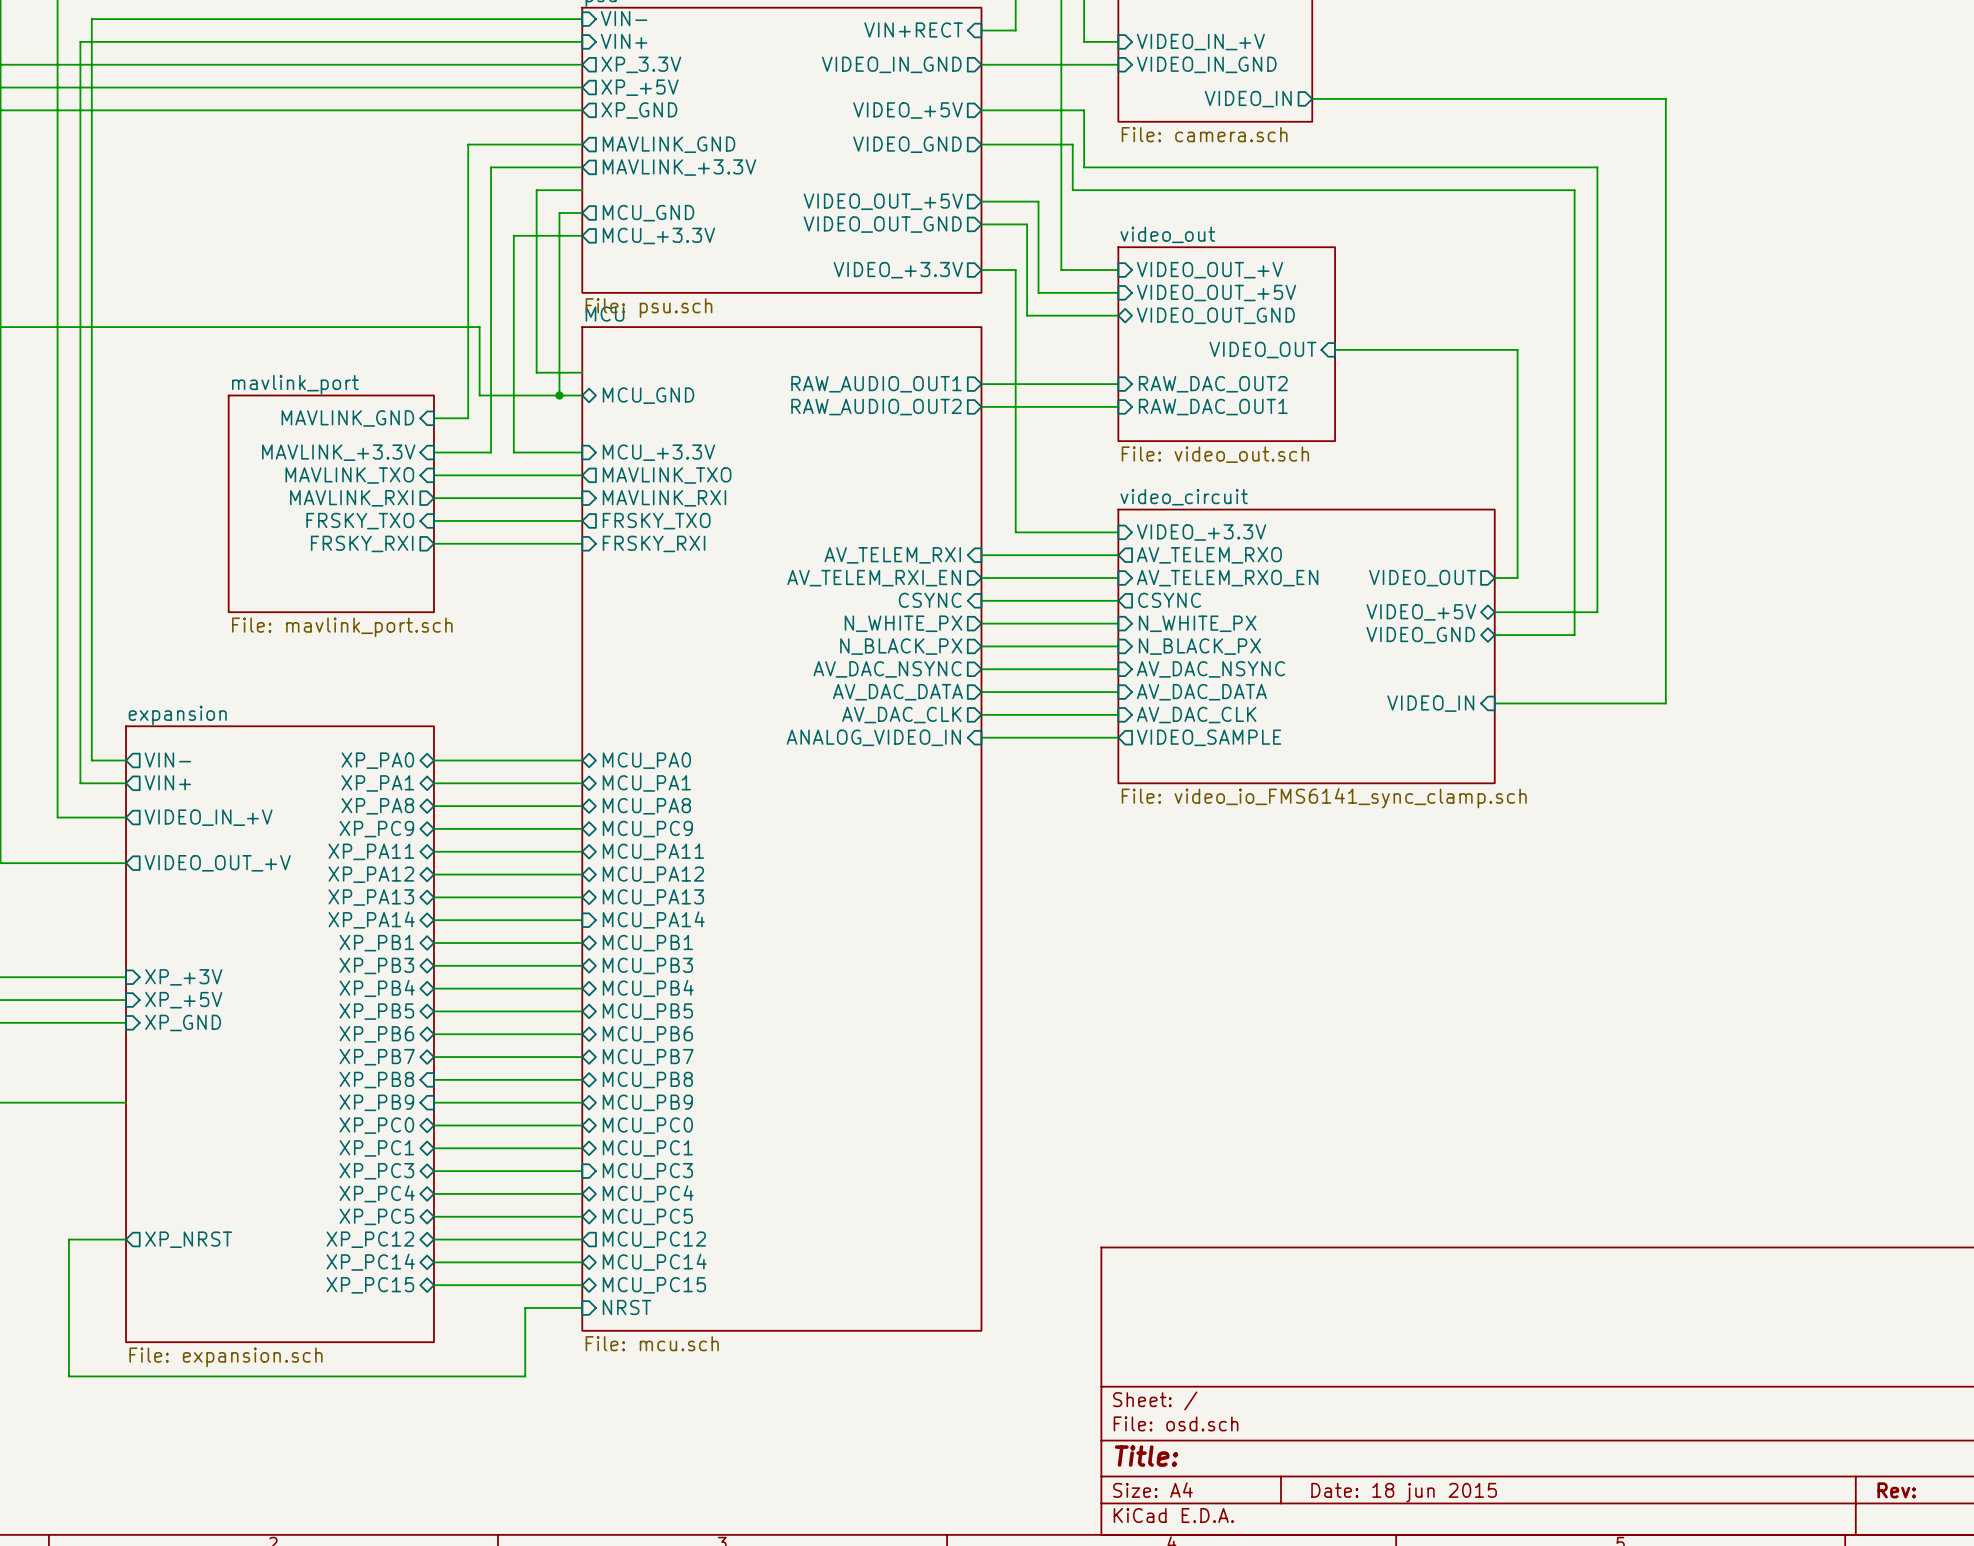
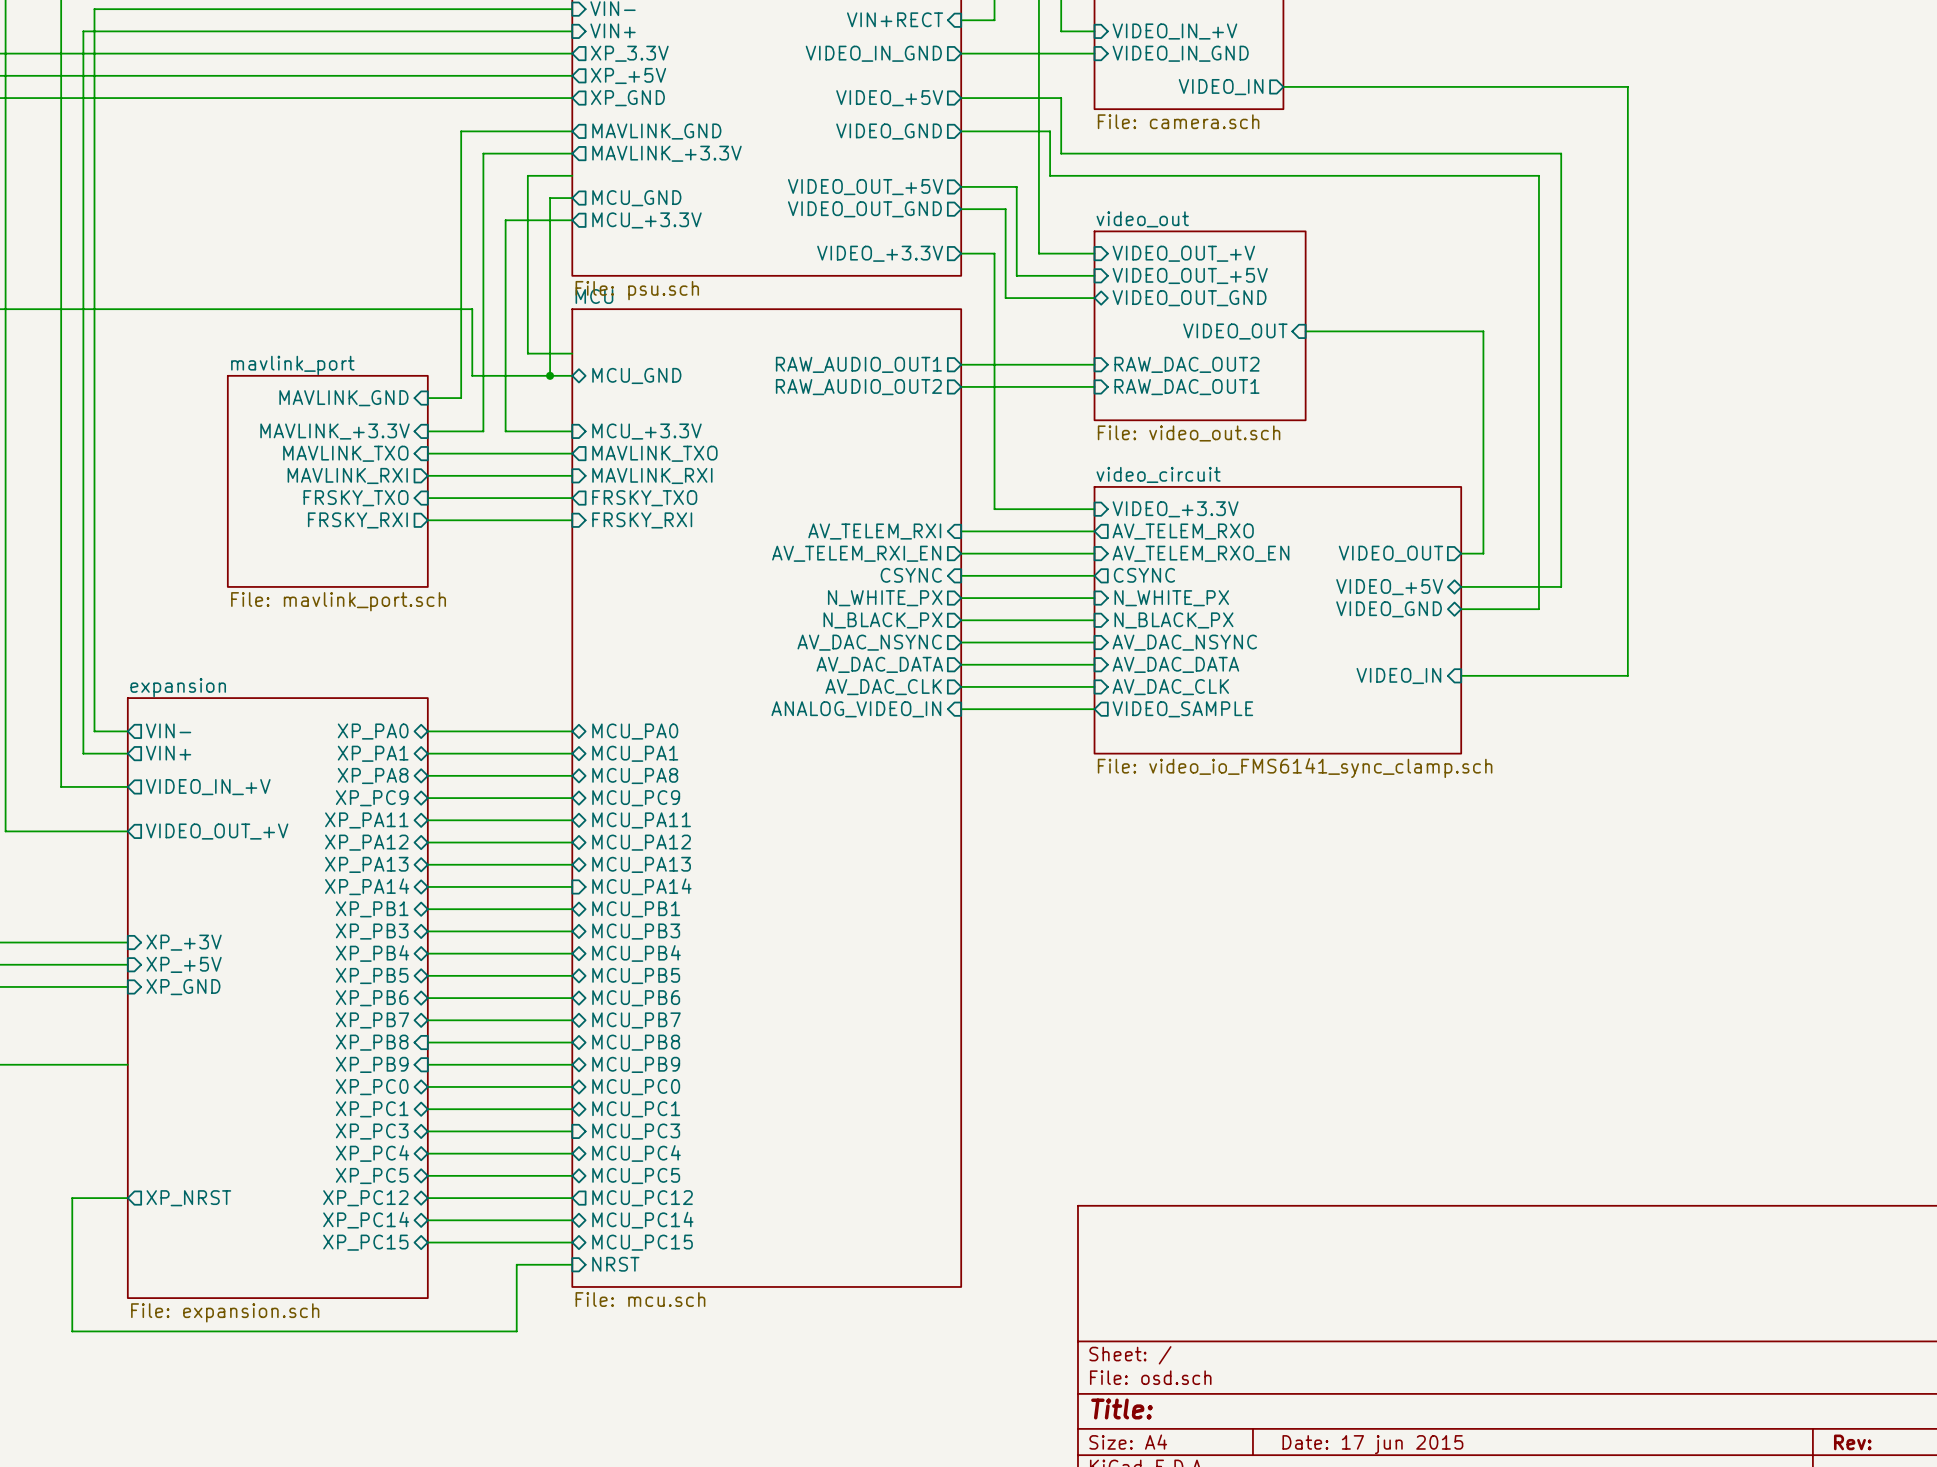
title block: Date: 18 jun 2015 (1404, 1492) -> Date: 17 jun 2015 (1372, 1444)

